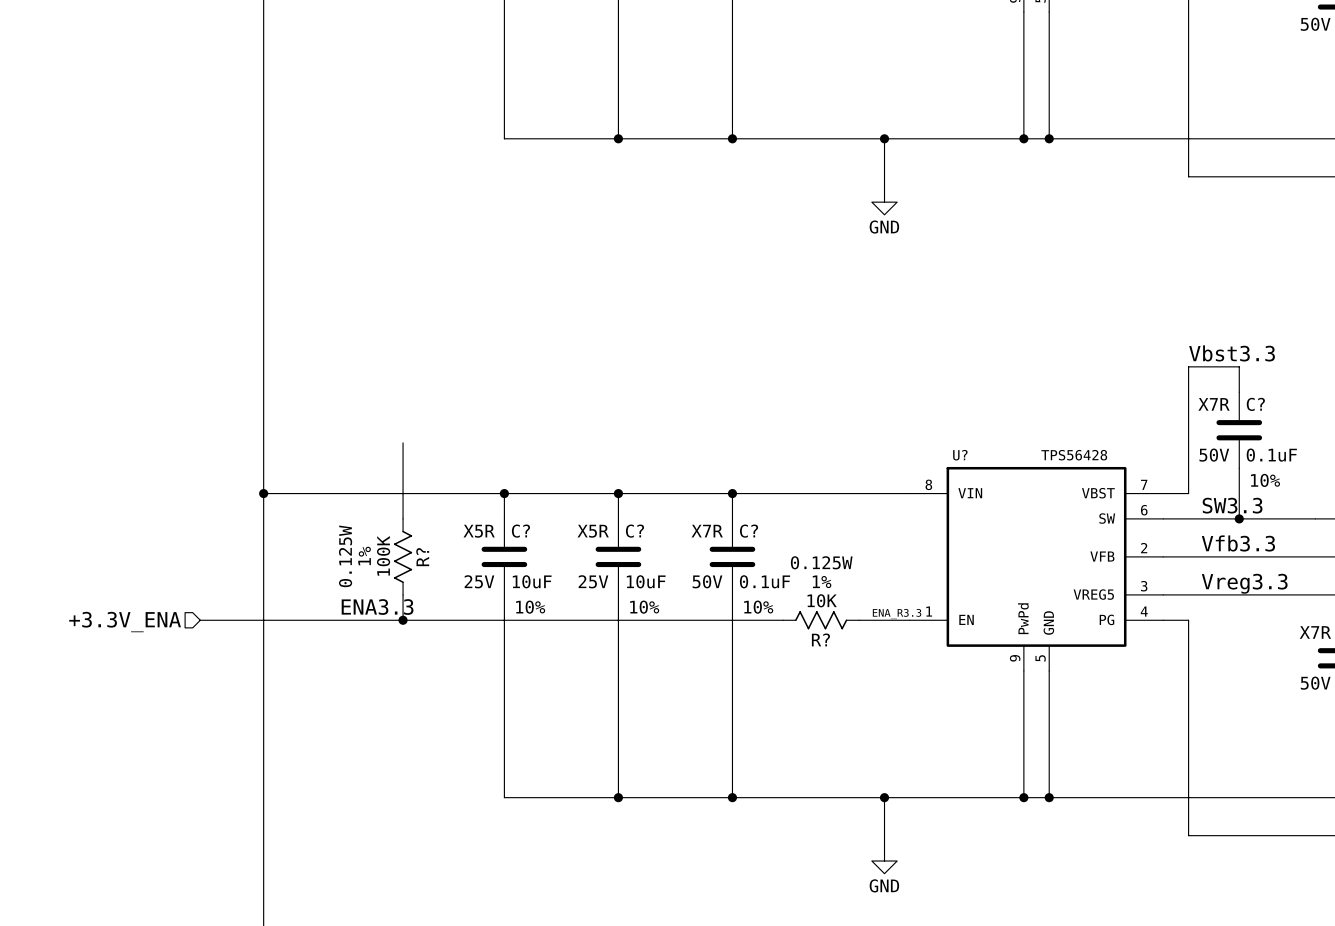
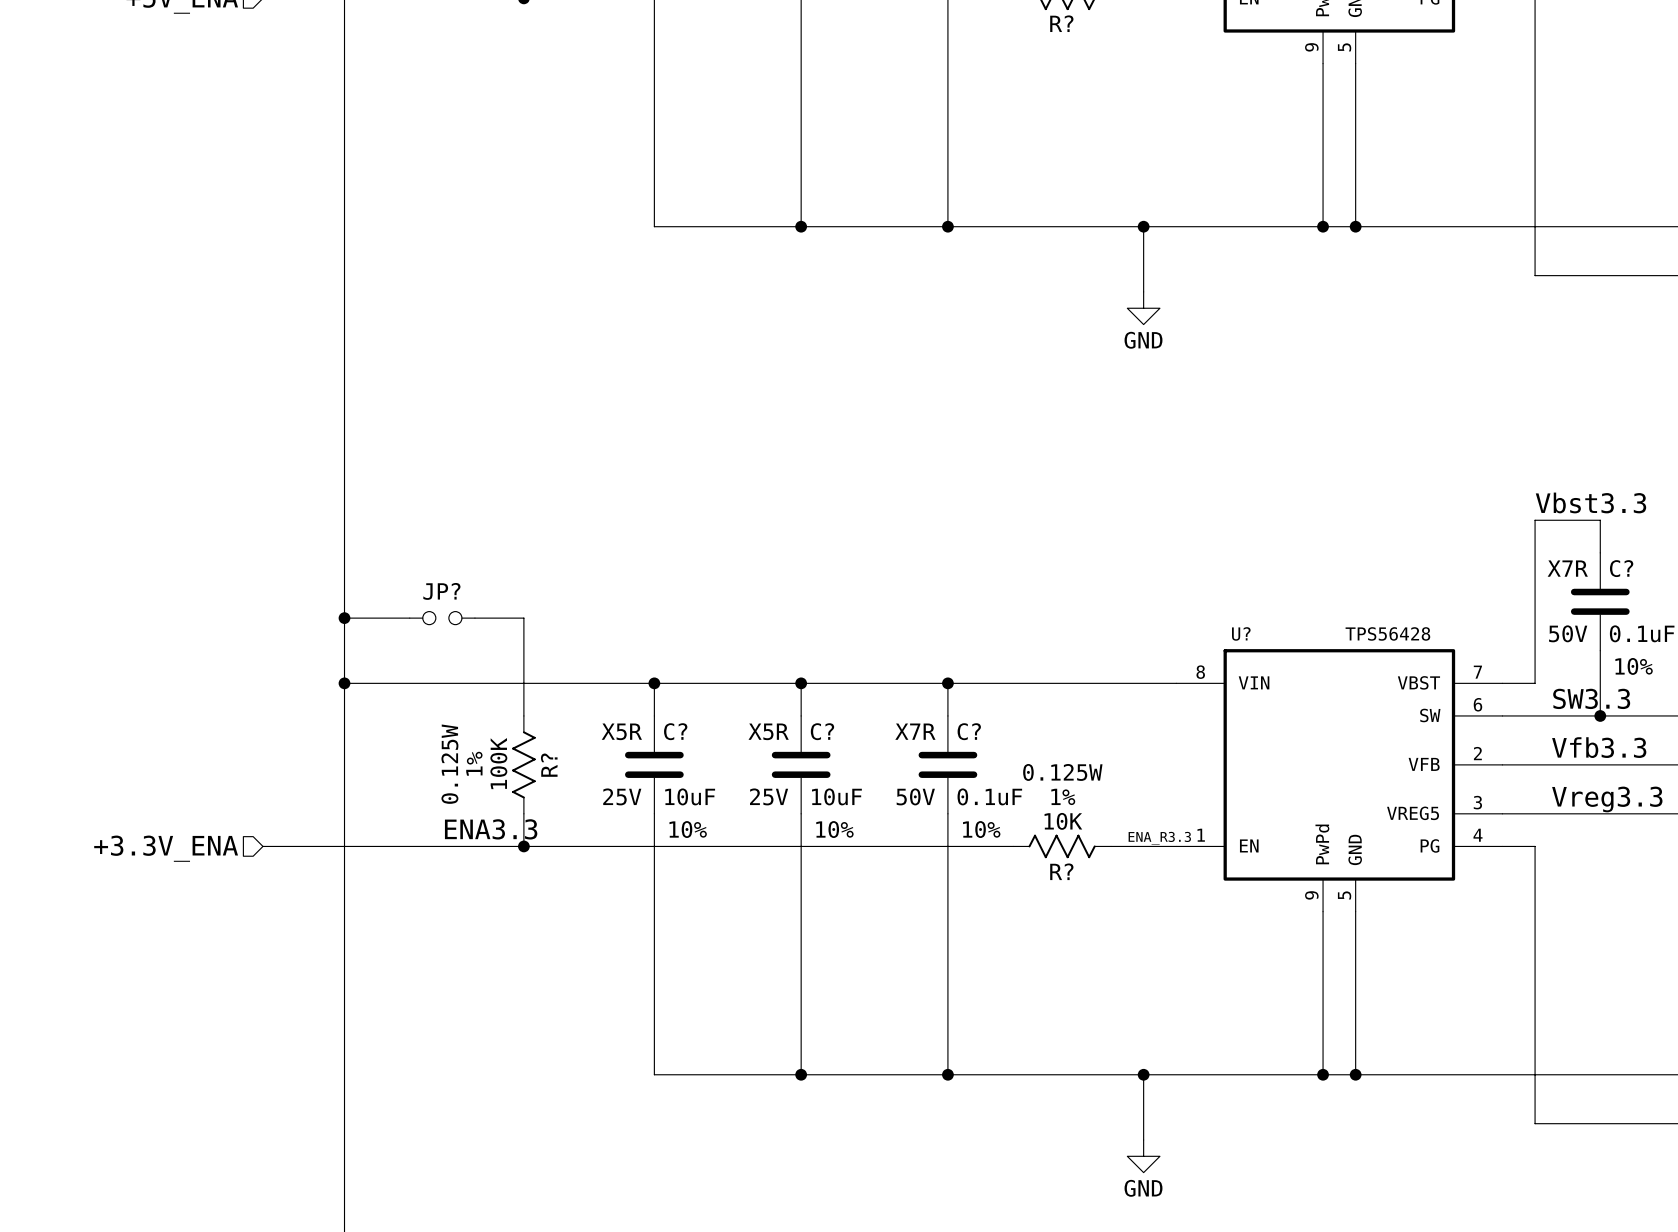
wire: none -> (344, 618) (409, 618)
junction: none -> (344, 618)
JP?: none -> (442, 618)
wire: none -> (474, 618) (523, 618)

